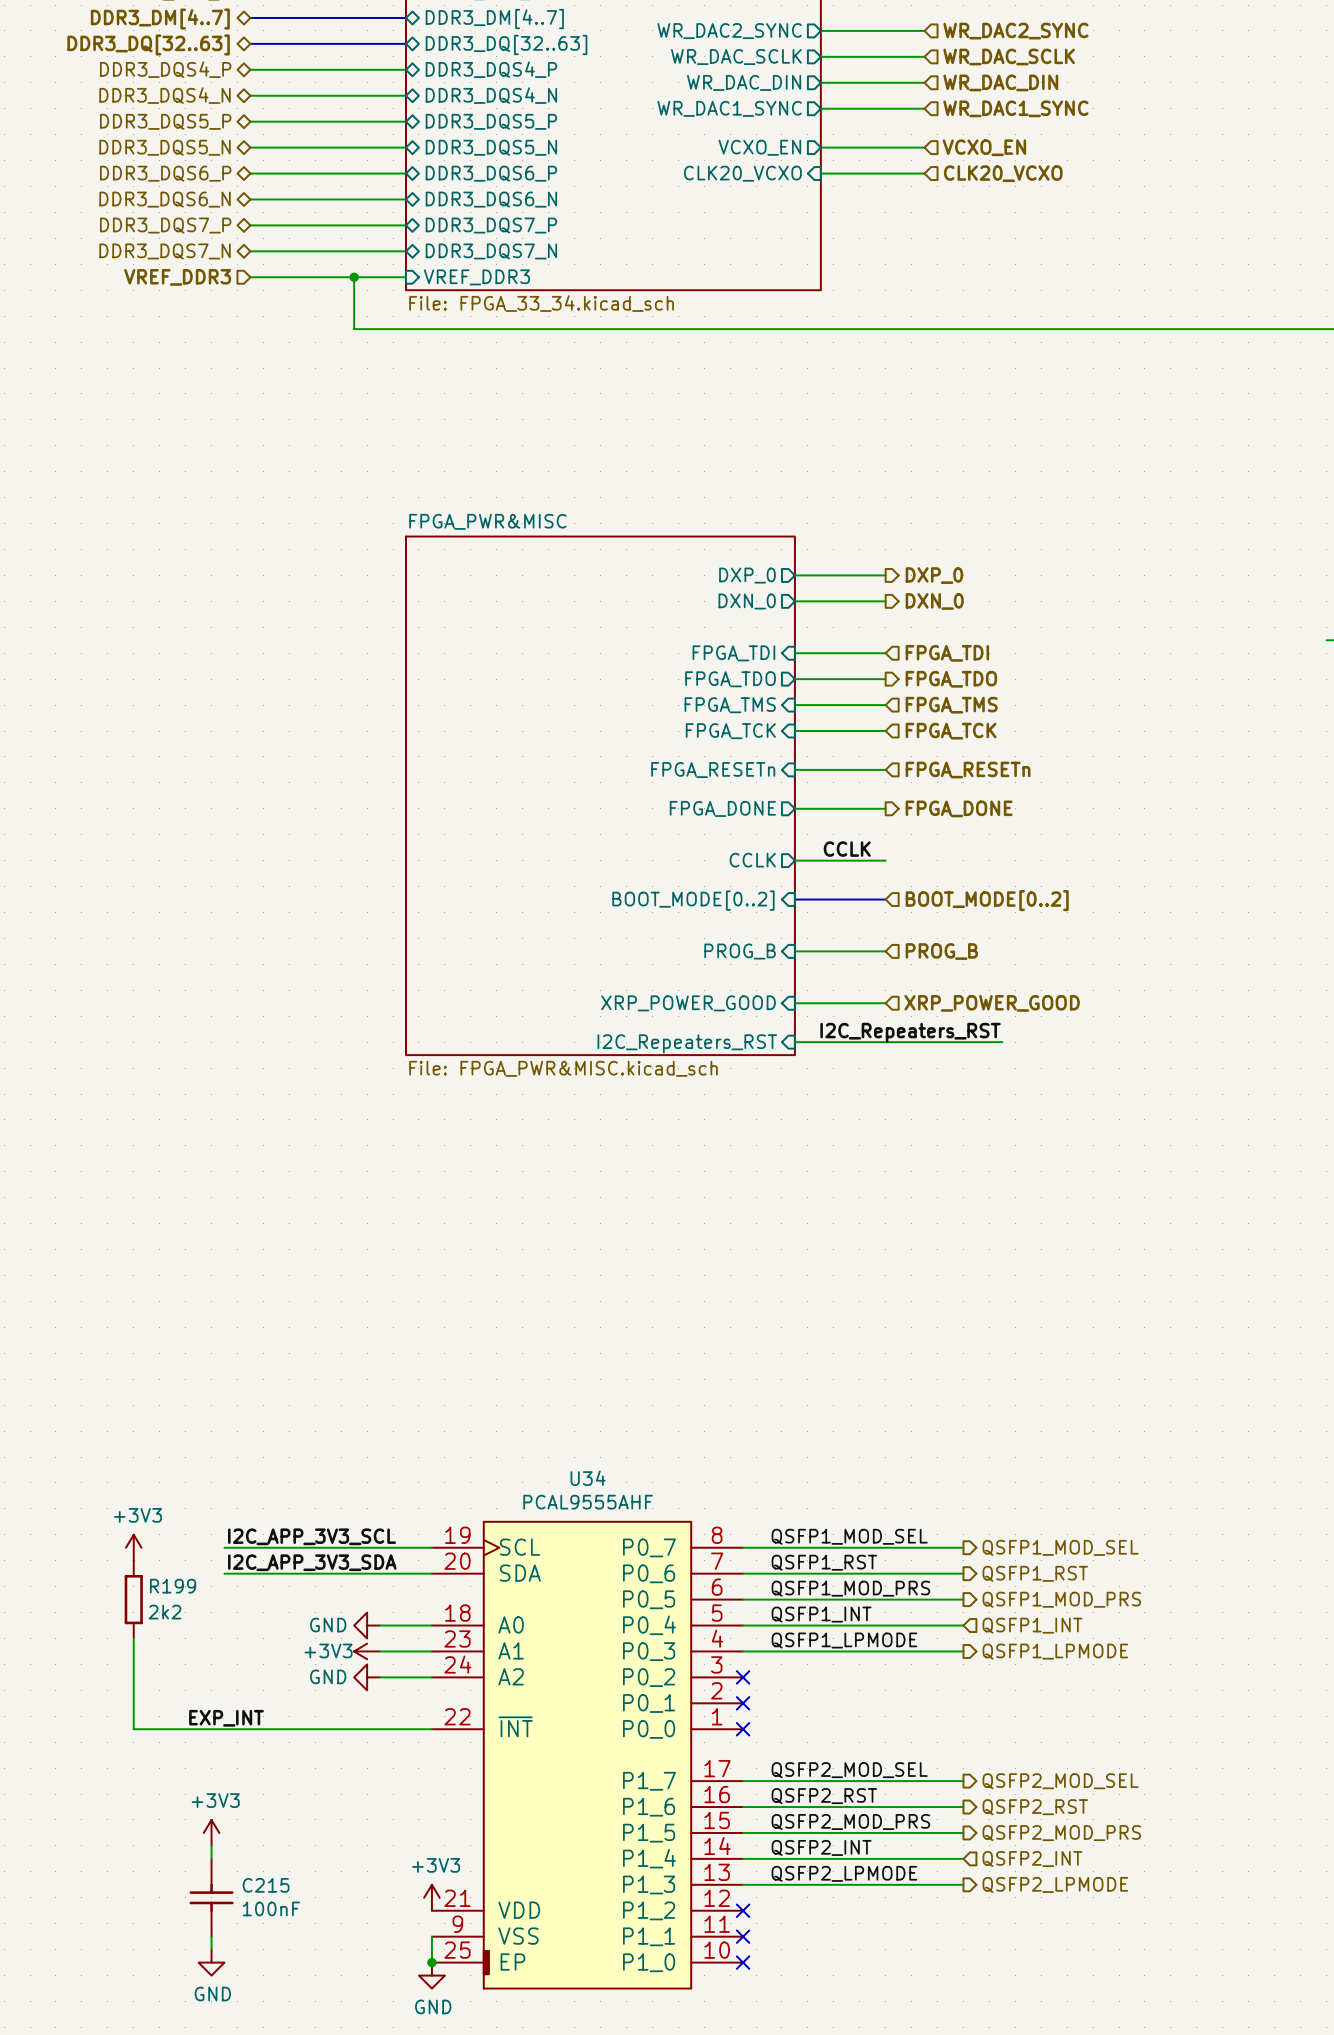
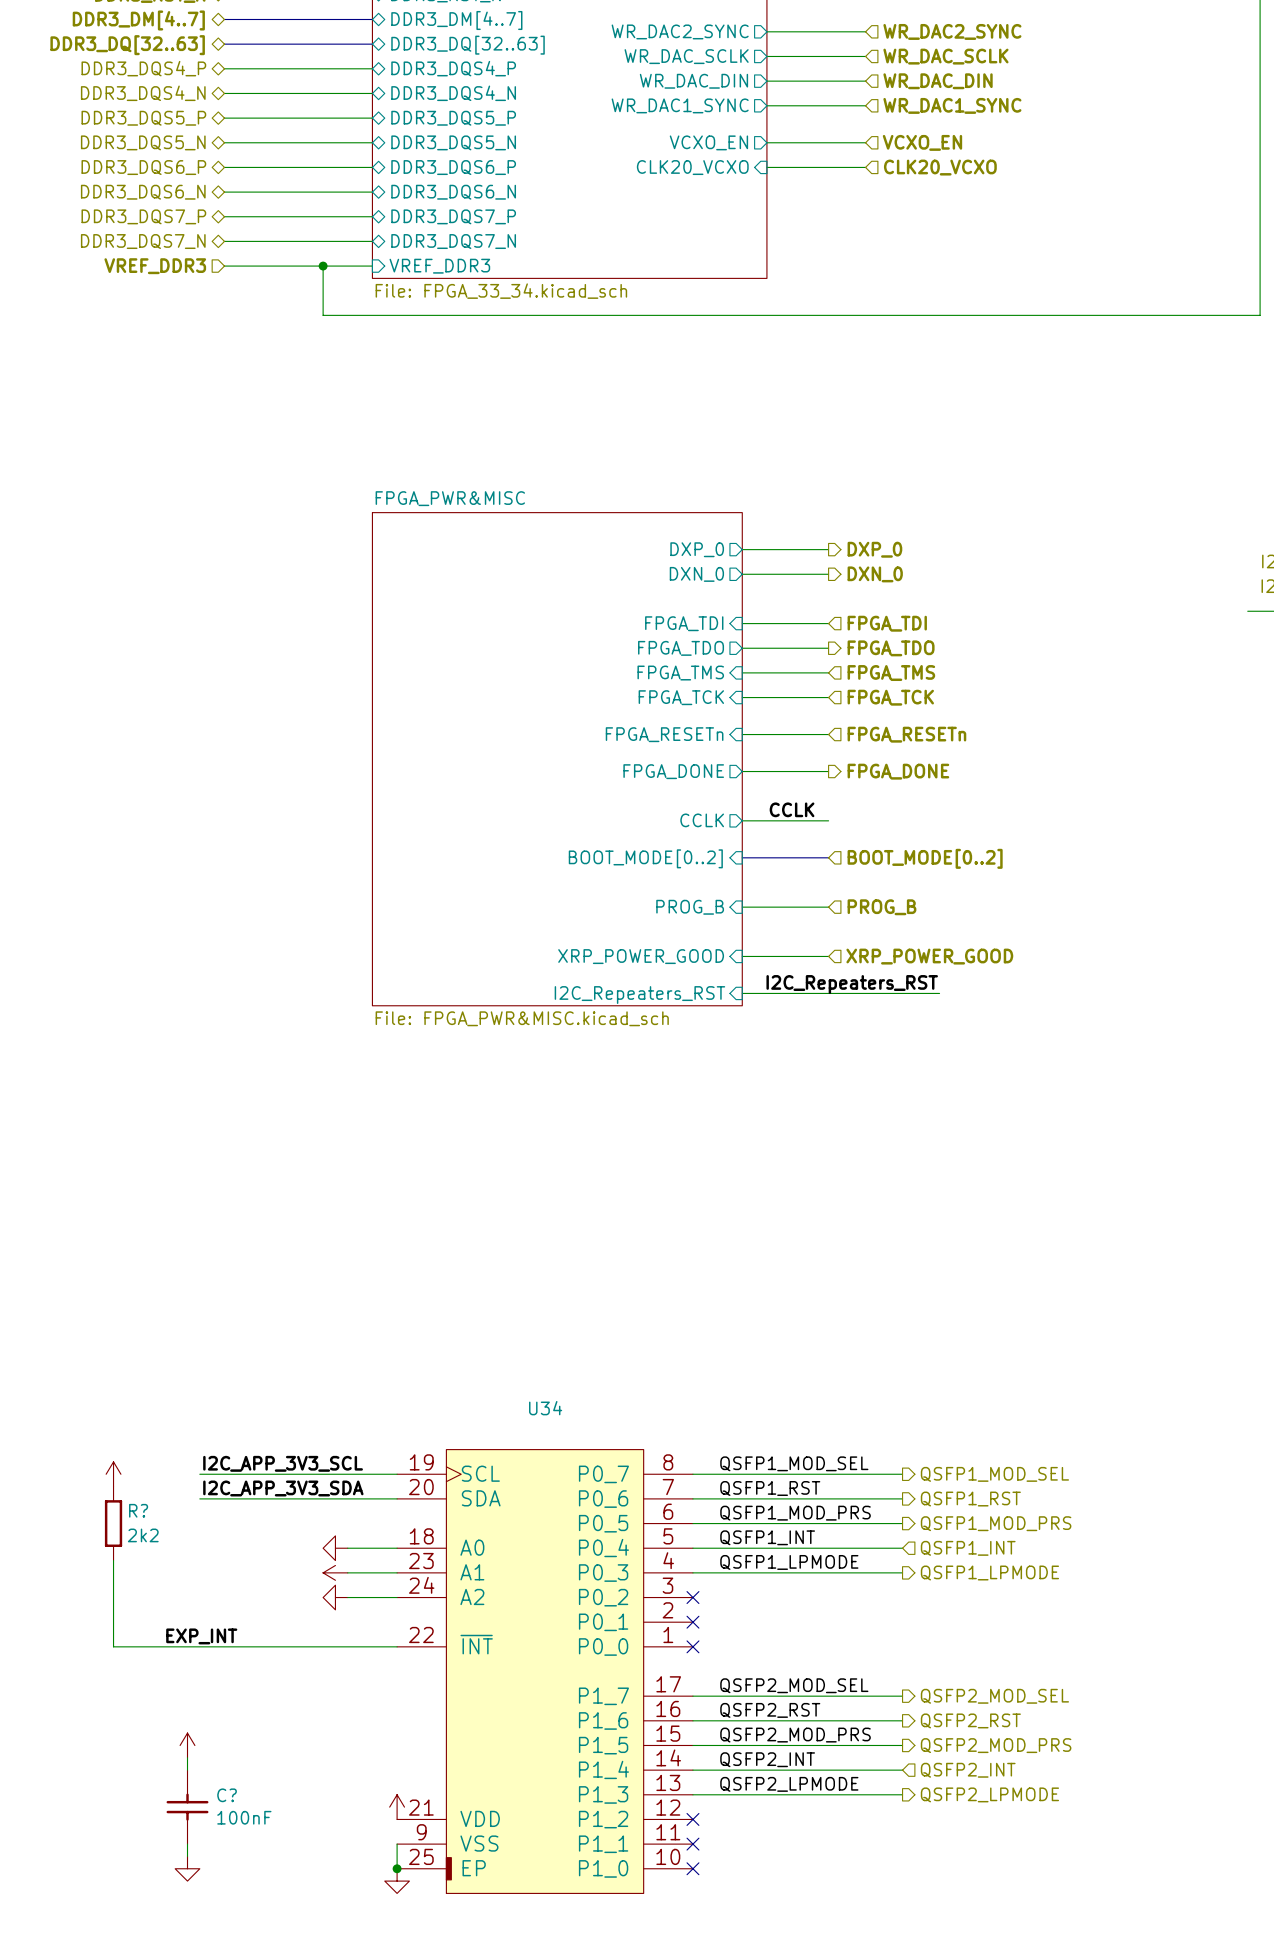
U34 value: PCAL9555AHF (588, 1502) -> none
power symbol text: +3V3 (137, 1515) -> none
R199 name: R199 (173, 1586) -> R? (138, 1510)
power symbol text: GND (328, 1625) -> none
power symbol text: +3V3 (328, 1650) -> none
power symbol text: GND (328, 1676) -> none
power symbol text: +3V3 (215, 1800) -> none
power symbol text: +3V3 (436, 1865) -> none
C215 name: C215 (266, 1885) -> C? (227, 1795)
power symbol text: GND (212, 1994) -> none
power symbol text: GND (433, 2006) -> none

